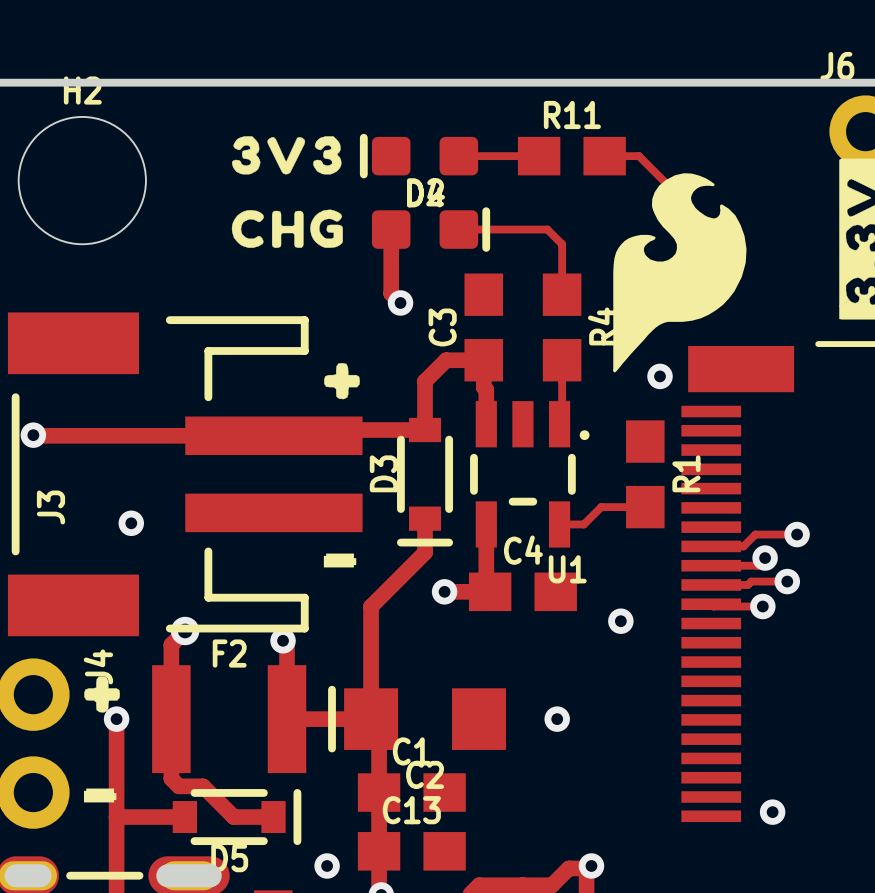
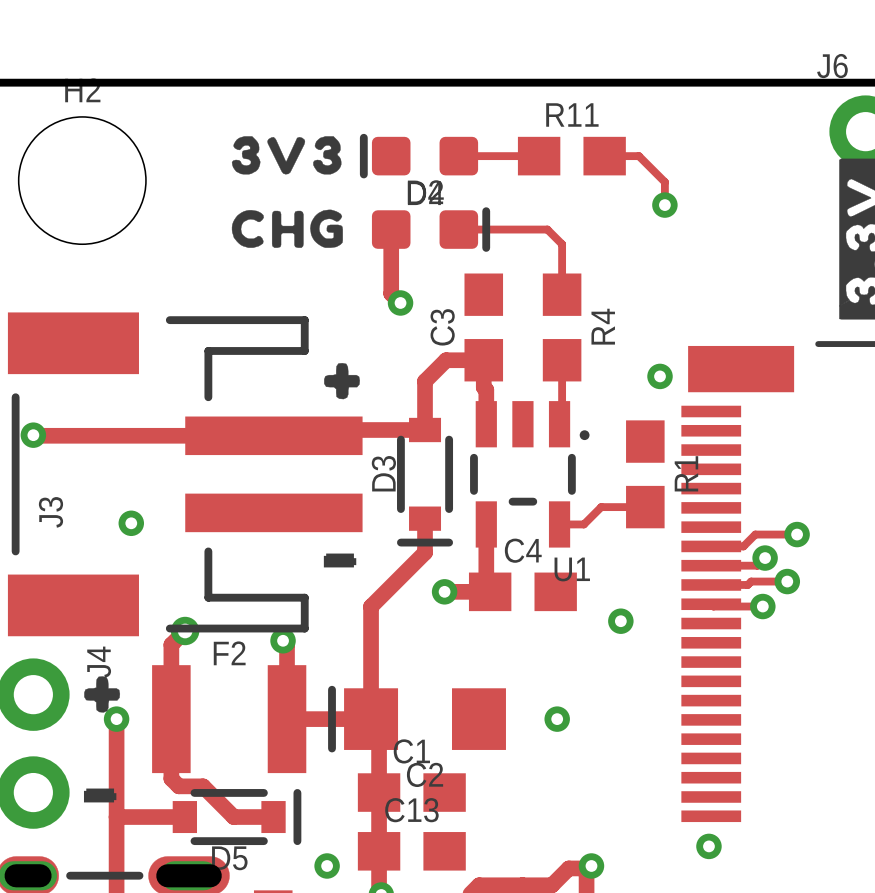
drawing: [613, 173, 747, 373] -> none
via position: (772, 812) -> (708, 846)

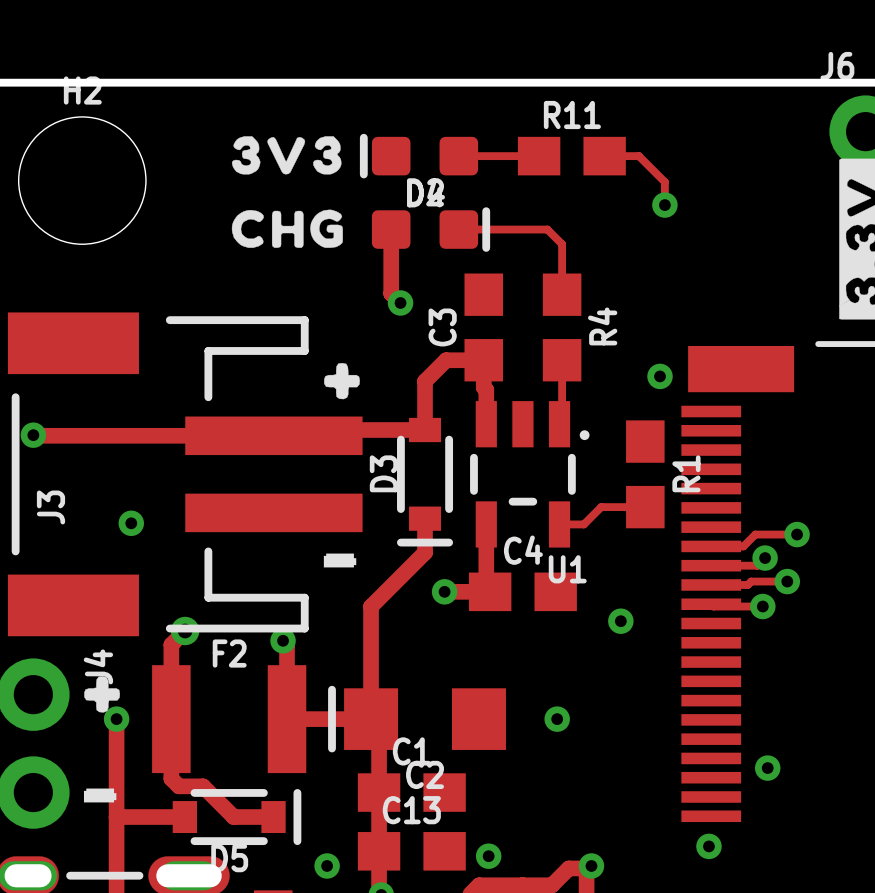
via: none -> (767, 768)
via: none -> (488, 856)

